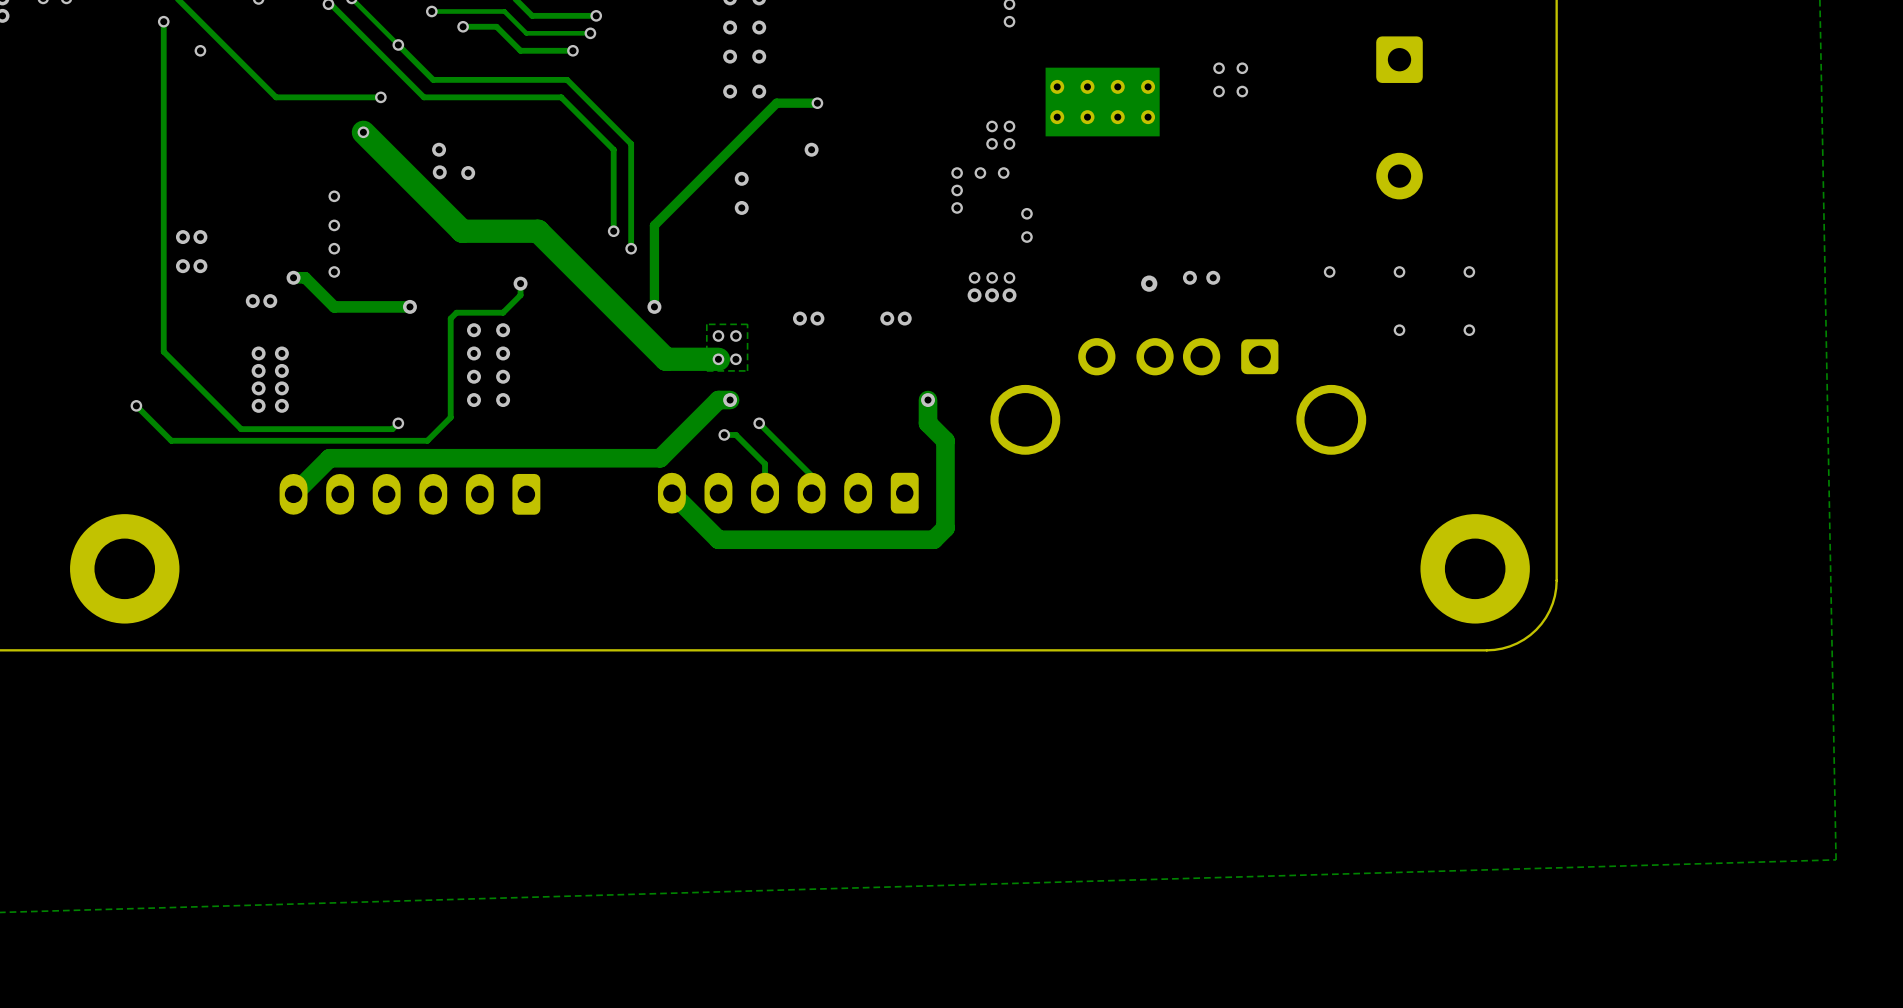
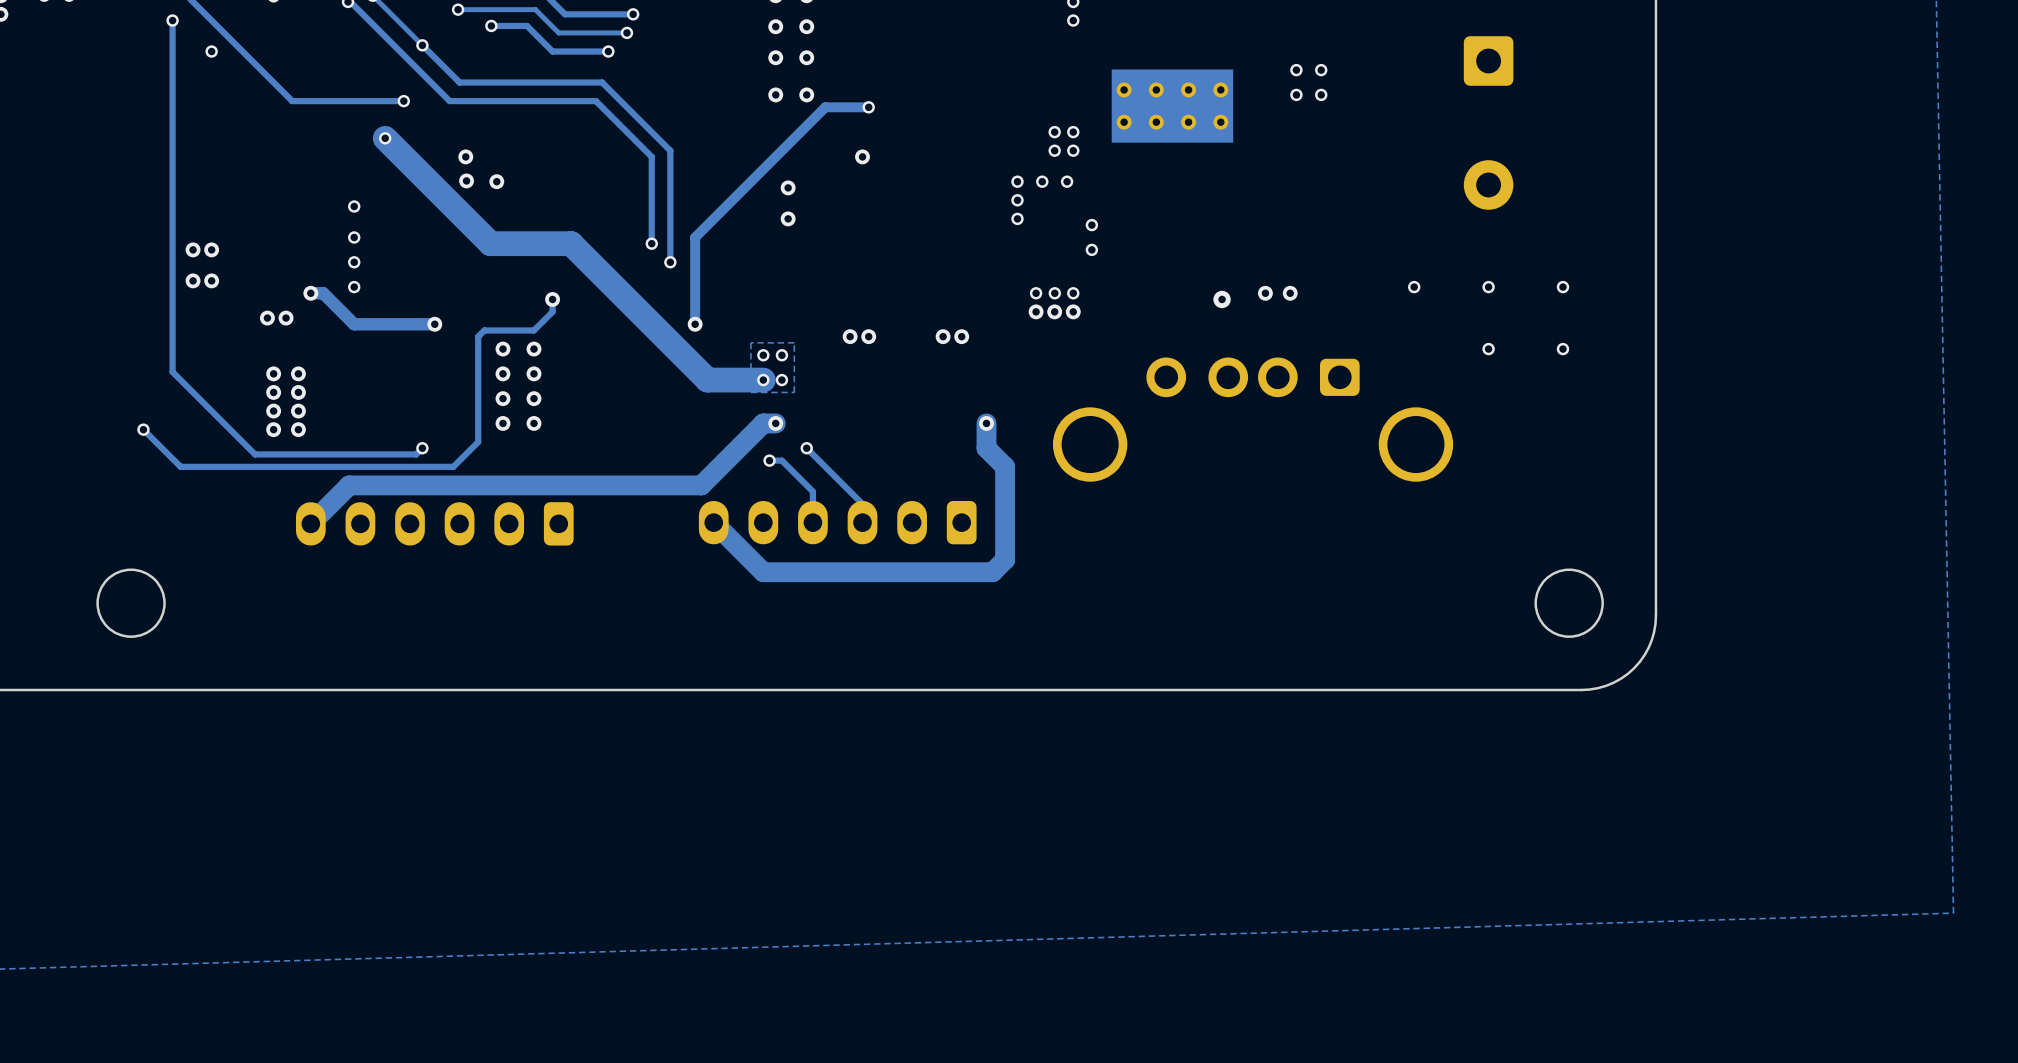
part: (124, 568) -> none
part: (1475, 568) -> none

